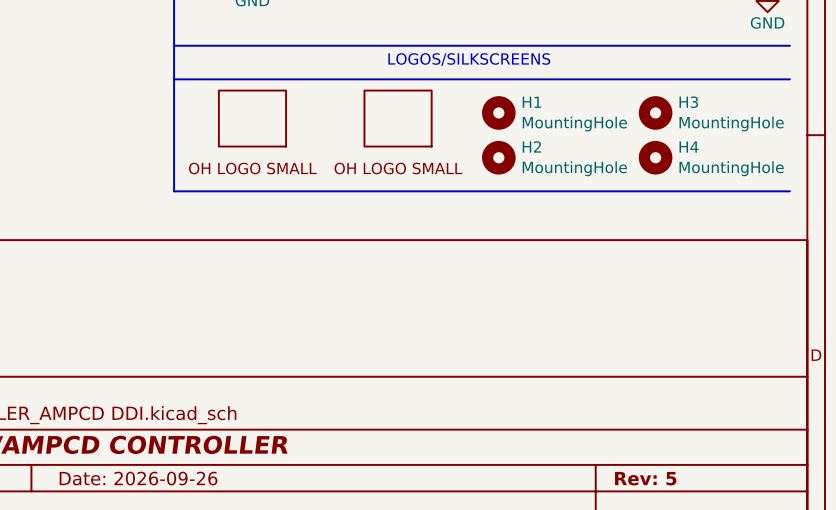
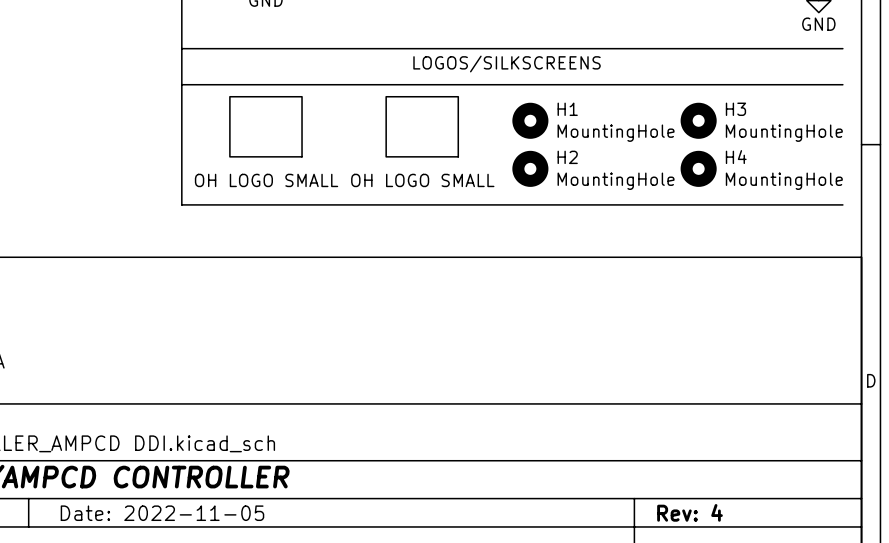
title block: Date: 2026-09-26 (138, 478) -> Date: 2022-11-05 (162, 513)
title block: Rev: 5 (645, 478) -> Rev: 4 (690, 512)

